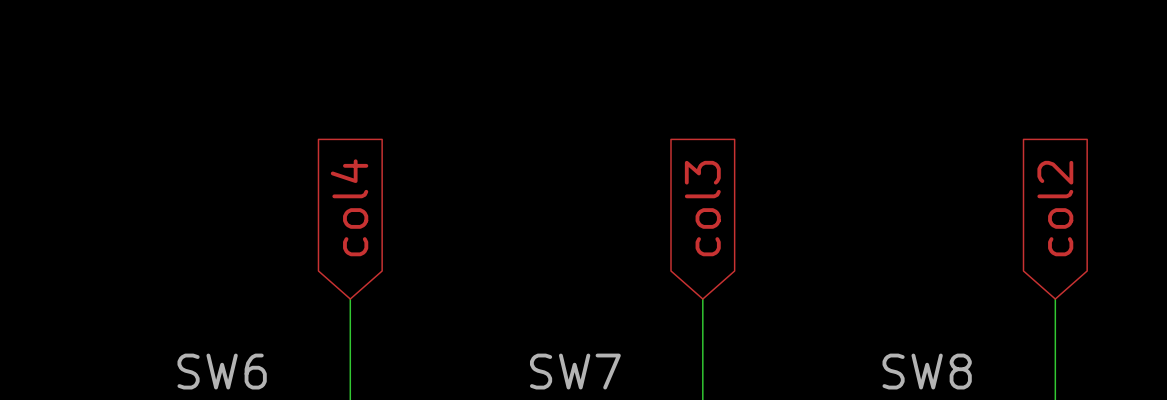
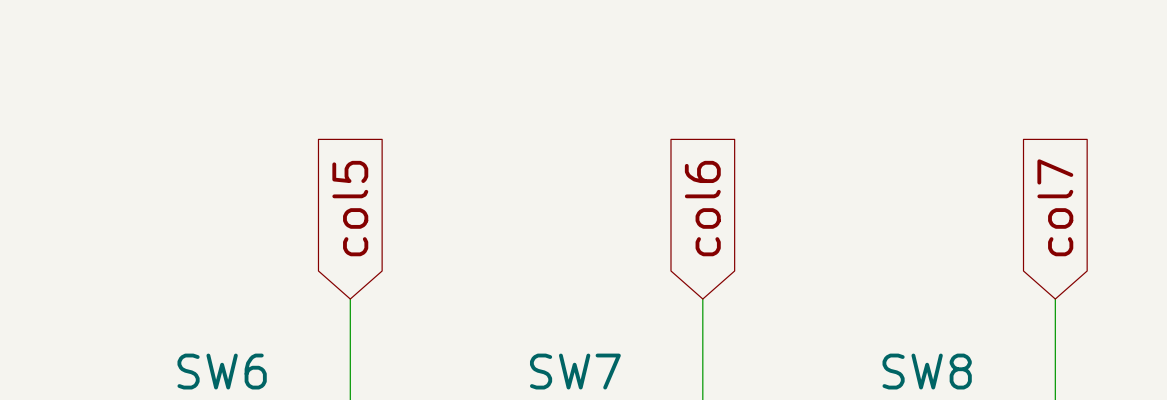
global label: col4 (349, 207) -> col5 (350, 208)
global label: col3 (702, 208) -> col6 (702, 208)
global label: col2 (1055, 208) -> col7 (1055, 207)

